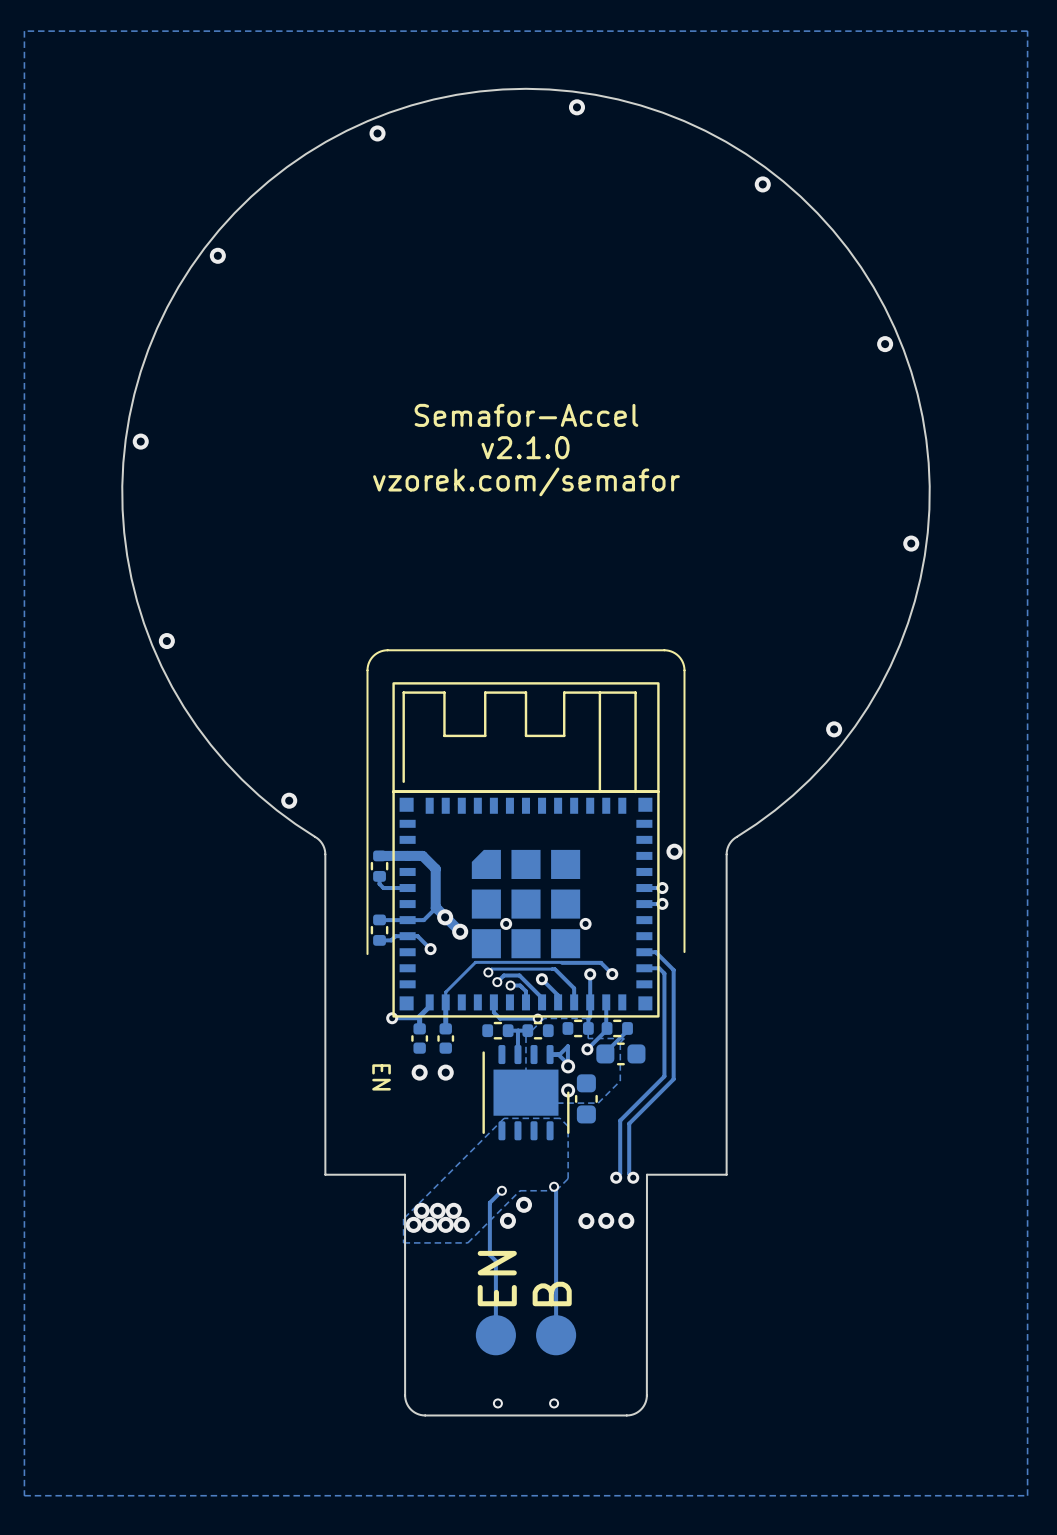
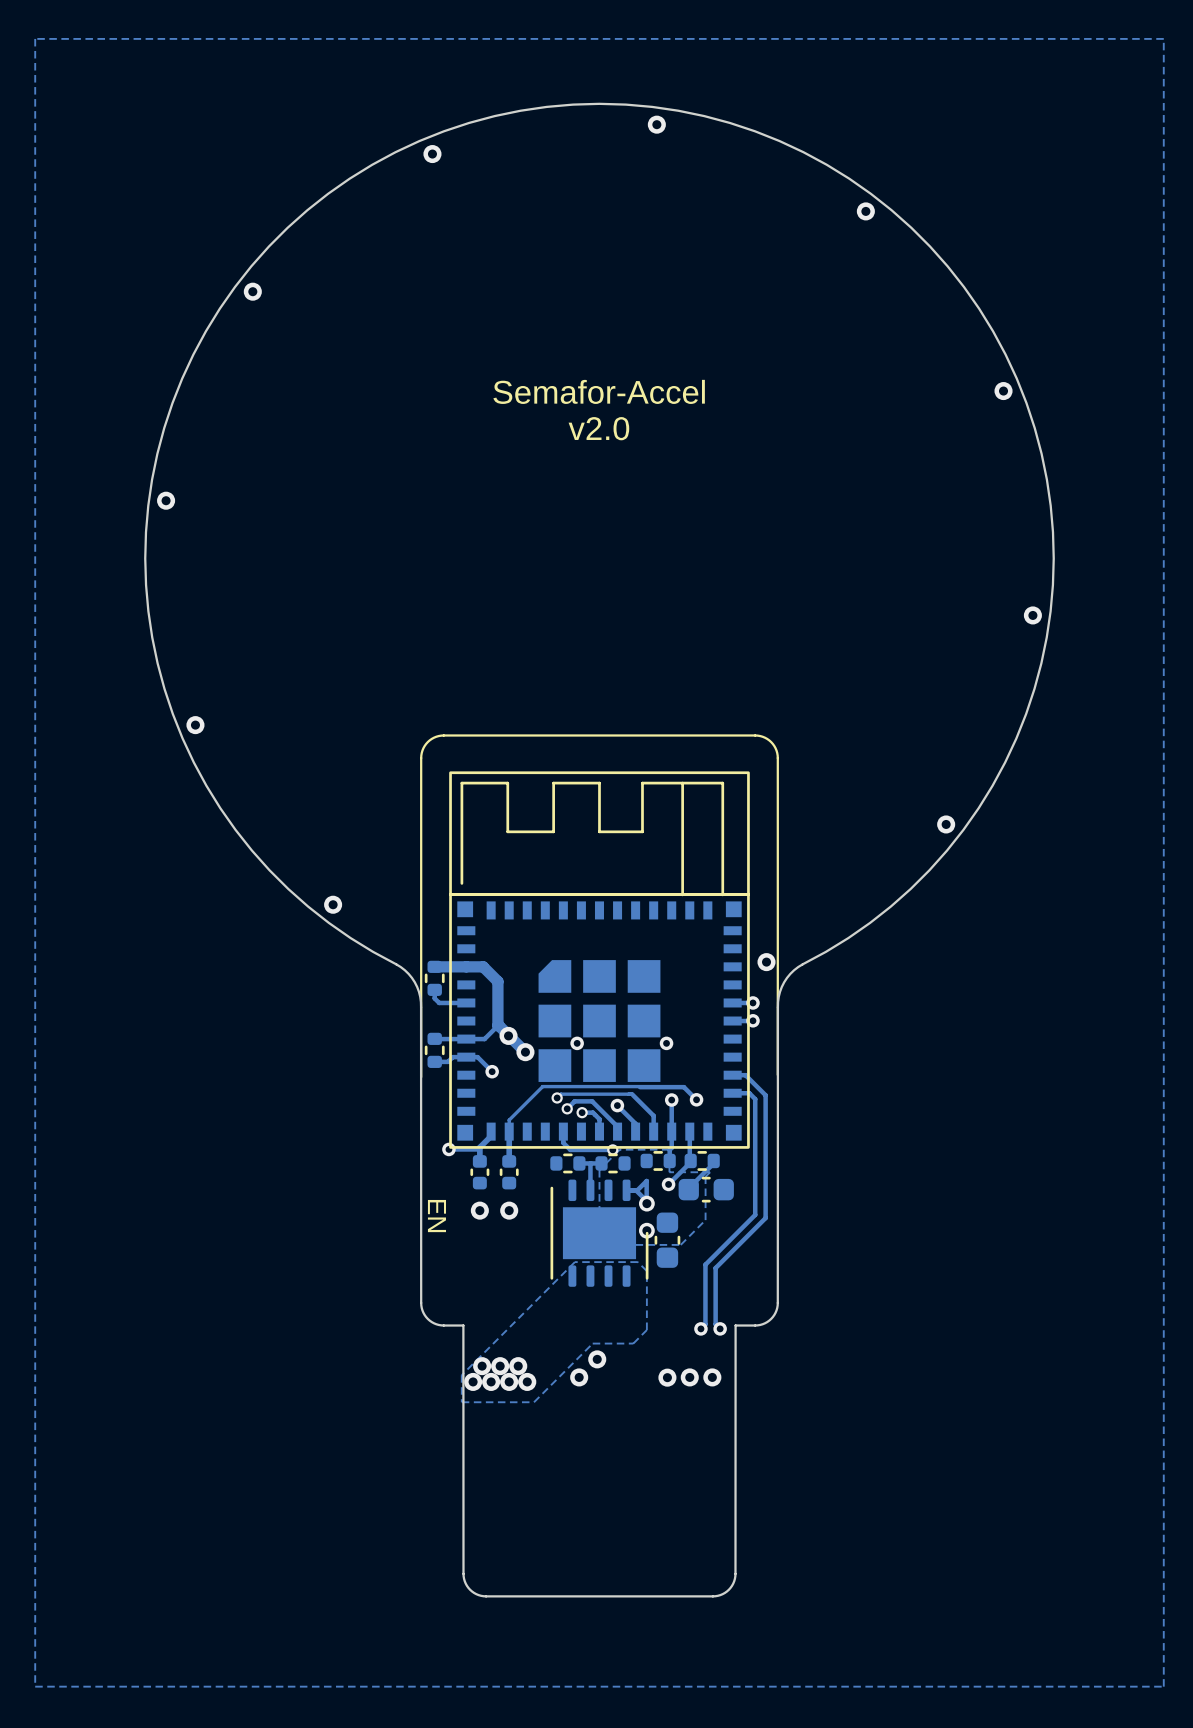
text: none -> v2.0 (598, 428)
text position: Semafor-Accel (526, 415) -> Semafor-Accel (599, 391)
text: v2.1.0 (525, 447) -> none
text: vzorek.com/semafor (526, 481) -> none
board edge: (664, 1174) (726, 1174) (727, 850) (733, 839) (775, 810) (826, 762) (868, 707) (890, 666) (914, 601) (924, 555) (929, 509) (926, 439) (911, 371) (884, 307) (847, 248) (800, 196) (745, 153) (684, 121) (618, 99) (572, 91) (526, 88) (456, 94) (389, 112) (346, 130) (306, 153) (251, 196) (204, 248) (167, 307) (140, 371) (125, 439) (122, 509) (127, 555) (137, 601) (161, 666) (183, 707) (225, 762) (276, 810) (318, 839) (324, 850) (325, 1174) (387, 1174) -> (755, 1325) (765, 1323) (771, 1318) (777, 1305) (777, 1007) (780, 991) (784, 982) (794, 970) (848, 938) (890, 906) (910, 888) (929, 870) (963, 829) (992, 785) (1005, 762) (1026, 713) (1041, 663) (1050, 611) (1052, 584) (1053, 558) (1050, 505) (1046, 479) (1034, 428) (1026, 403) (1005, 354) (993, 331) (964, 287) (930, 246) (911, 227) (870, 193) (849, 178) (803, 152) (754, 131) (704, 116) (678, 110) (625, 104) (599, 103) (573, 104) (520, 110) (494, 116) (444, 131) (395, 152) (372, 164) (349, 178) (307, 210) (268, 246) (234, 287) (219, 308) (193, 354) (172, 403) (164, 428) (152, 479) (148, 505) (145, 558) (146, 584) (152, 637) (157, 663) (172, 713) (193, 762) (206, 785) (235, 829) (251, 850) (288, 888) (308, 906) (350, 938) (404, 970) (414, 982) (418, 991) (421, 1007) (421, 1305) (427, 1318) (433, 1323) (443, 1325)
track: (554, 1186) (556, 1188) (556, 1335) -> none
via: (554, 1186) -> none
track: (501, 1190) (489, 1202) (489, 1254) (495, 1260) (495, 1335) -> none
via: (501, 1190) -> none
text: EN (497, 1278) -> none
text: B (552, 1294) -> none
part: (525, 1335) -> none
via: (497, 1403) -> none
via: (554, 1403) -> none

